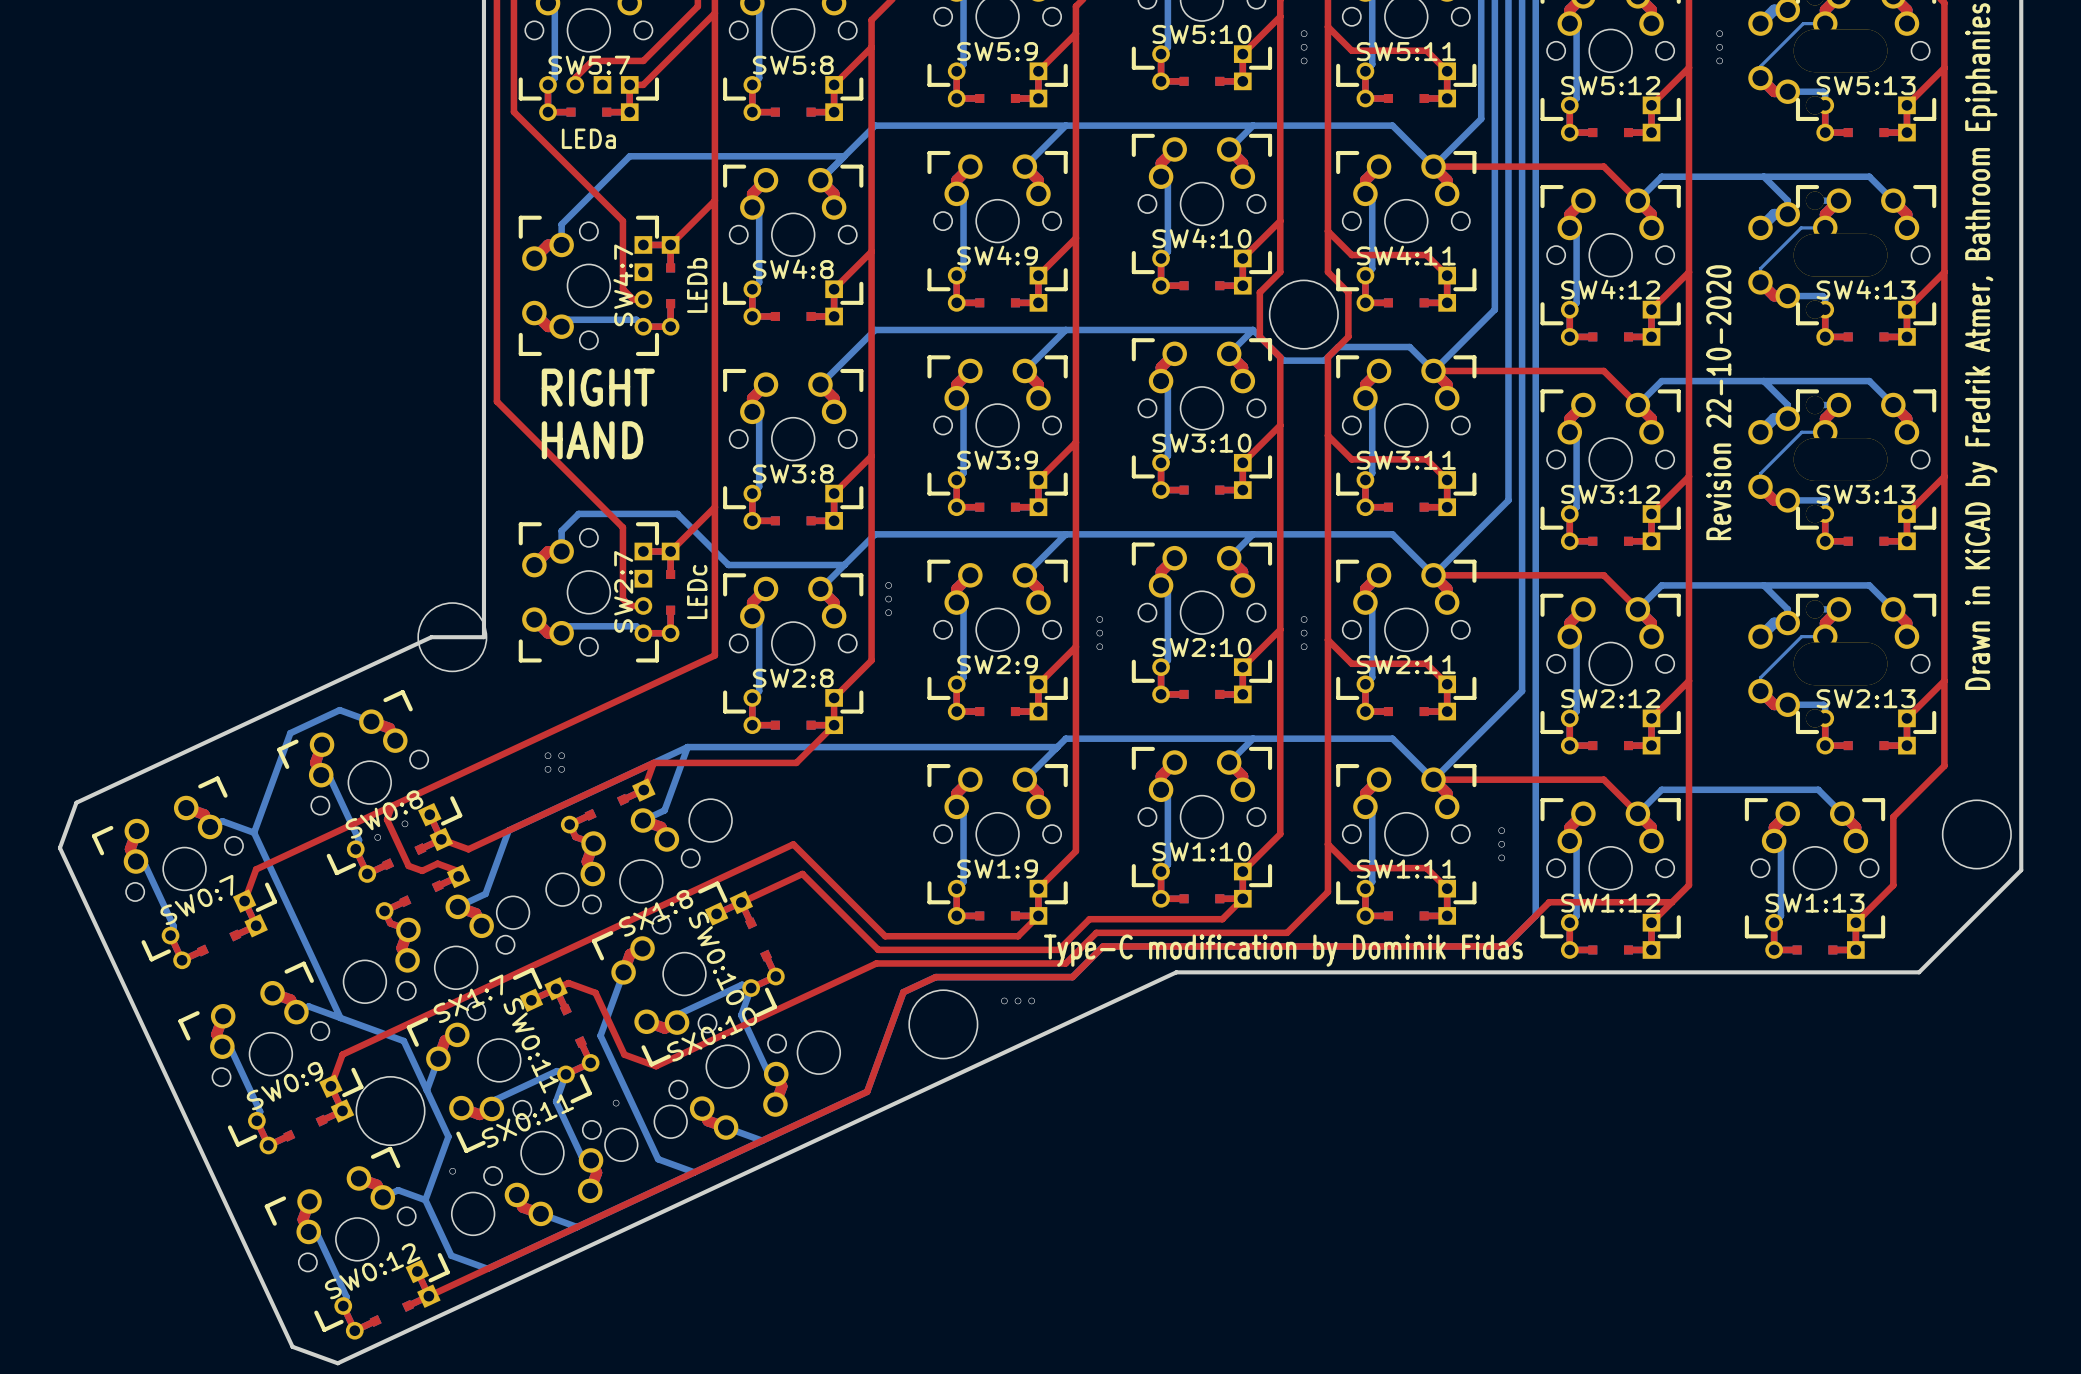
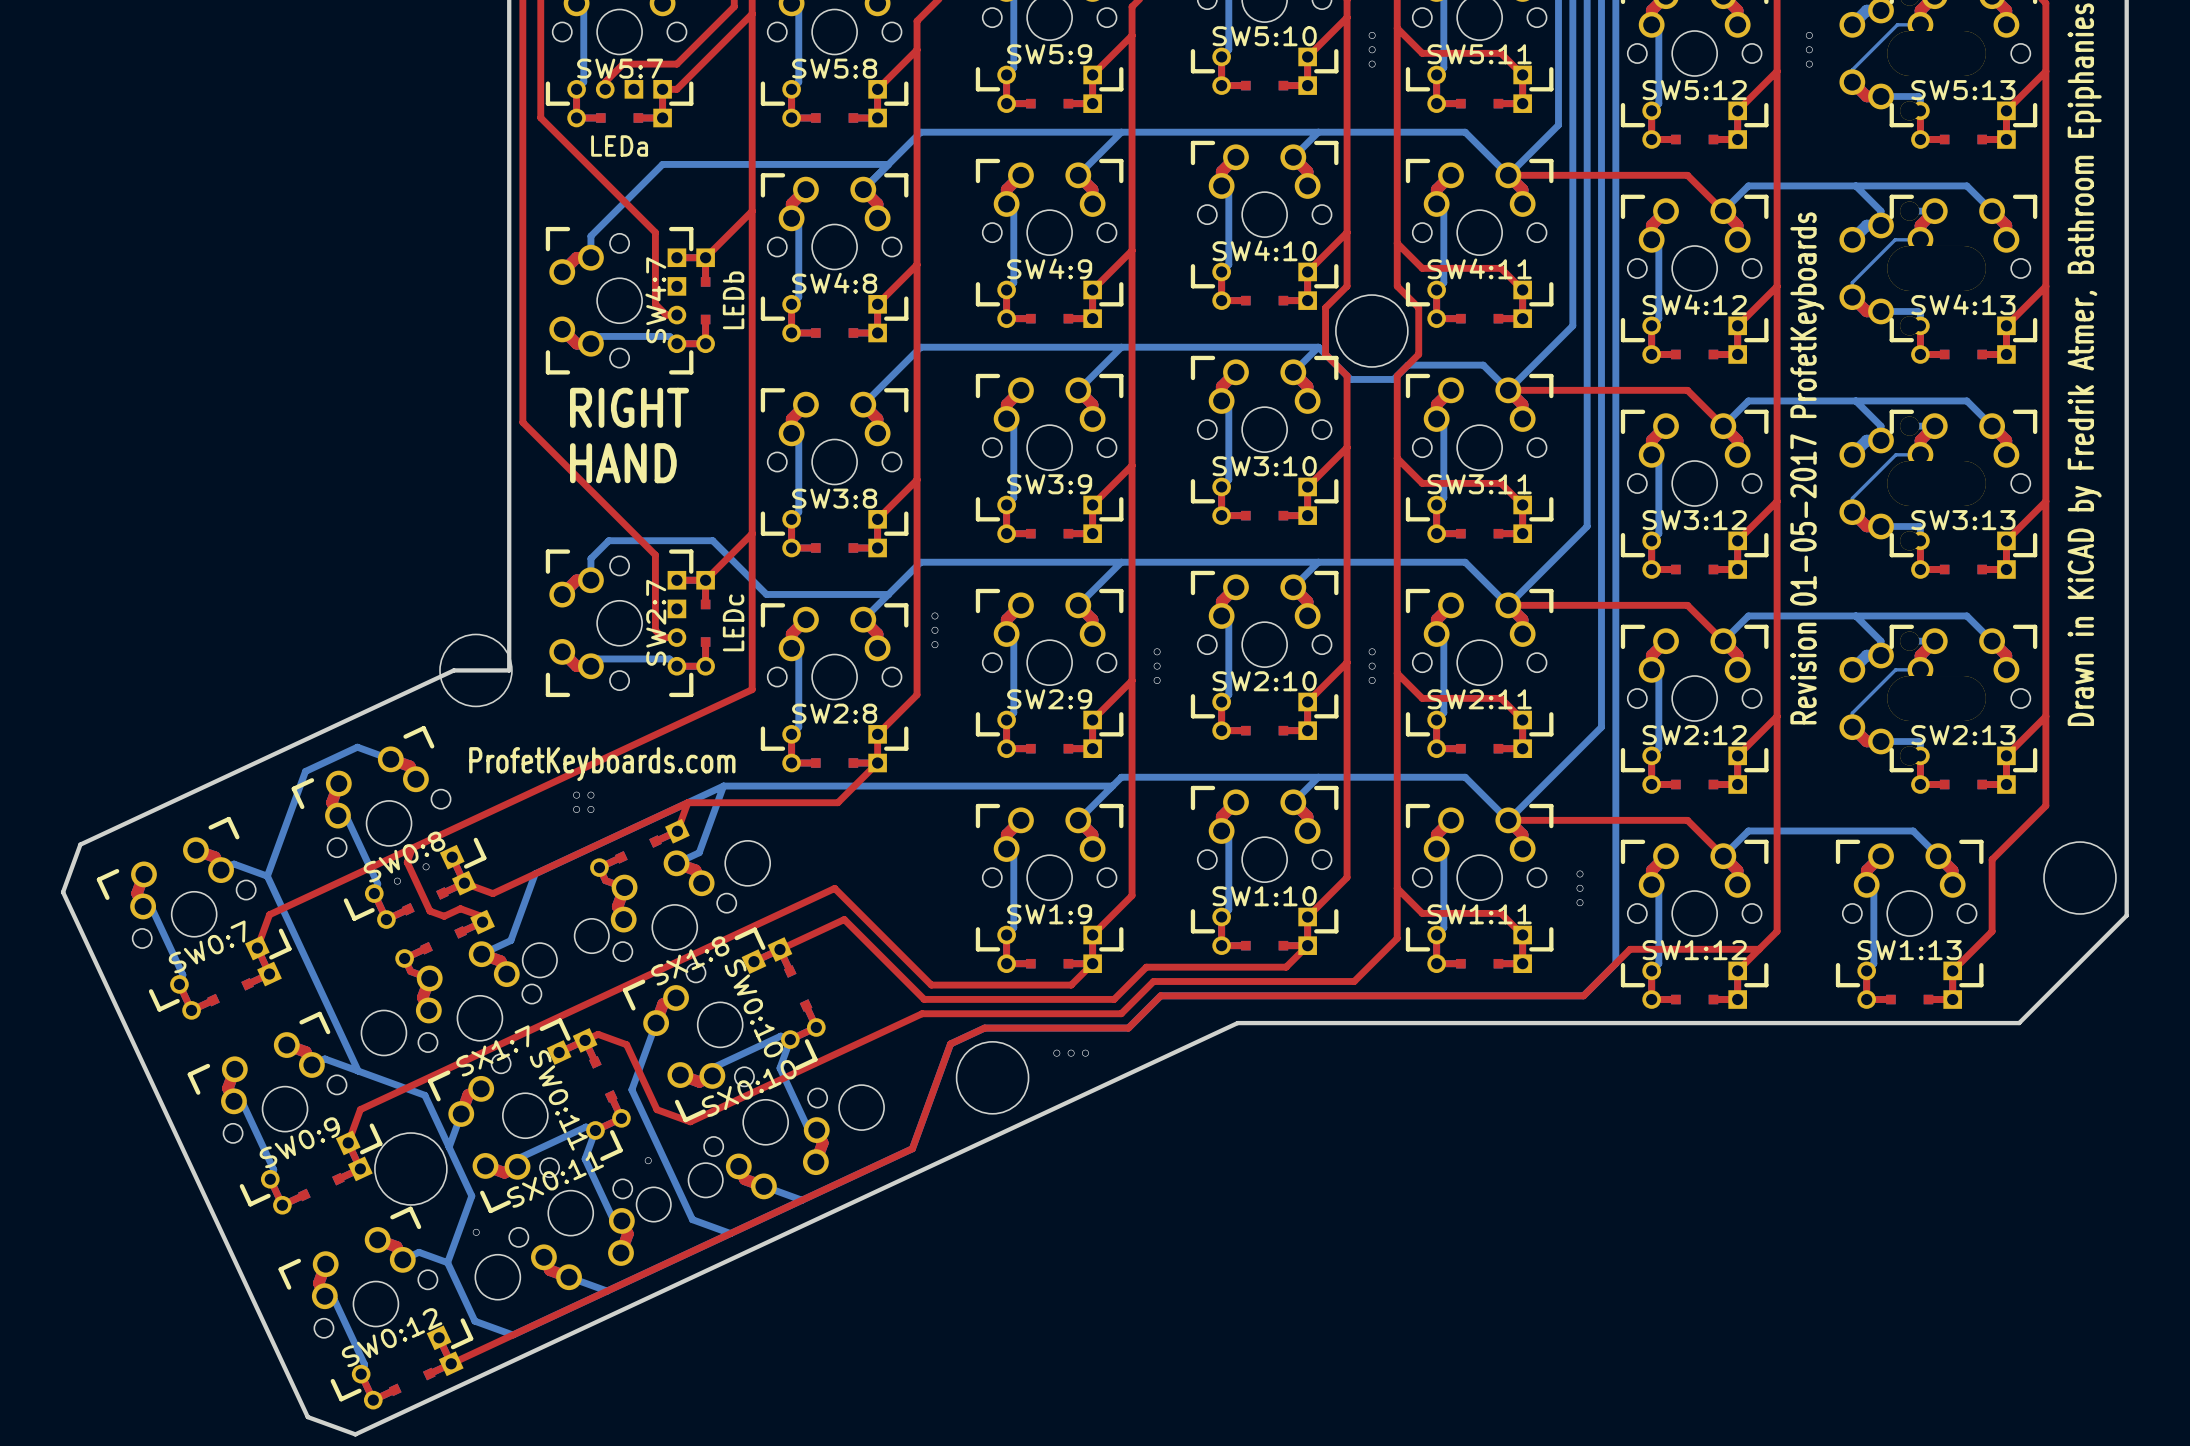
text: Revision 22-10-2020 (1718, 402) -> none
text: none -> Revision 01-05-2017 ProfetKeyboards (1807, 468)
text: none -> ProfetKeyboards.com (602, 764)
text: Type-C modification by Dominik Fidas (1283, 950) -> none

